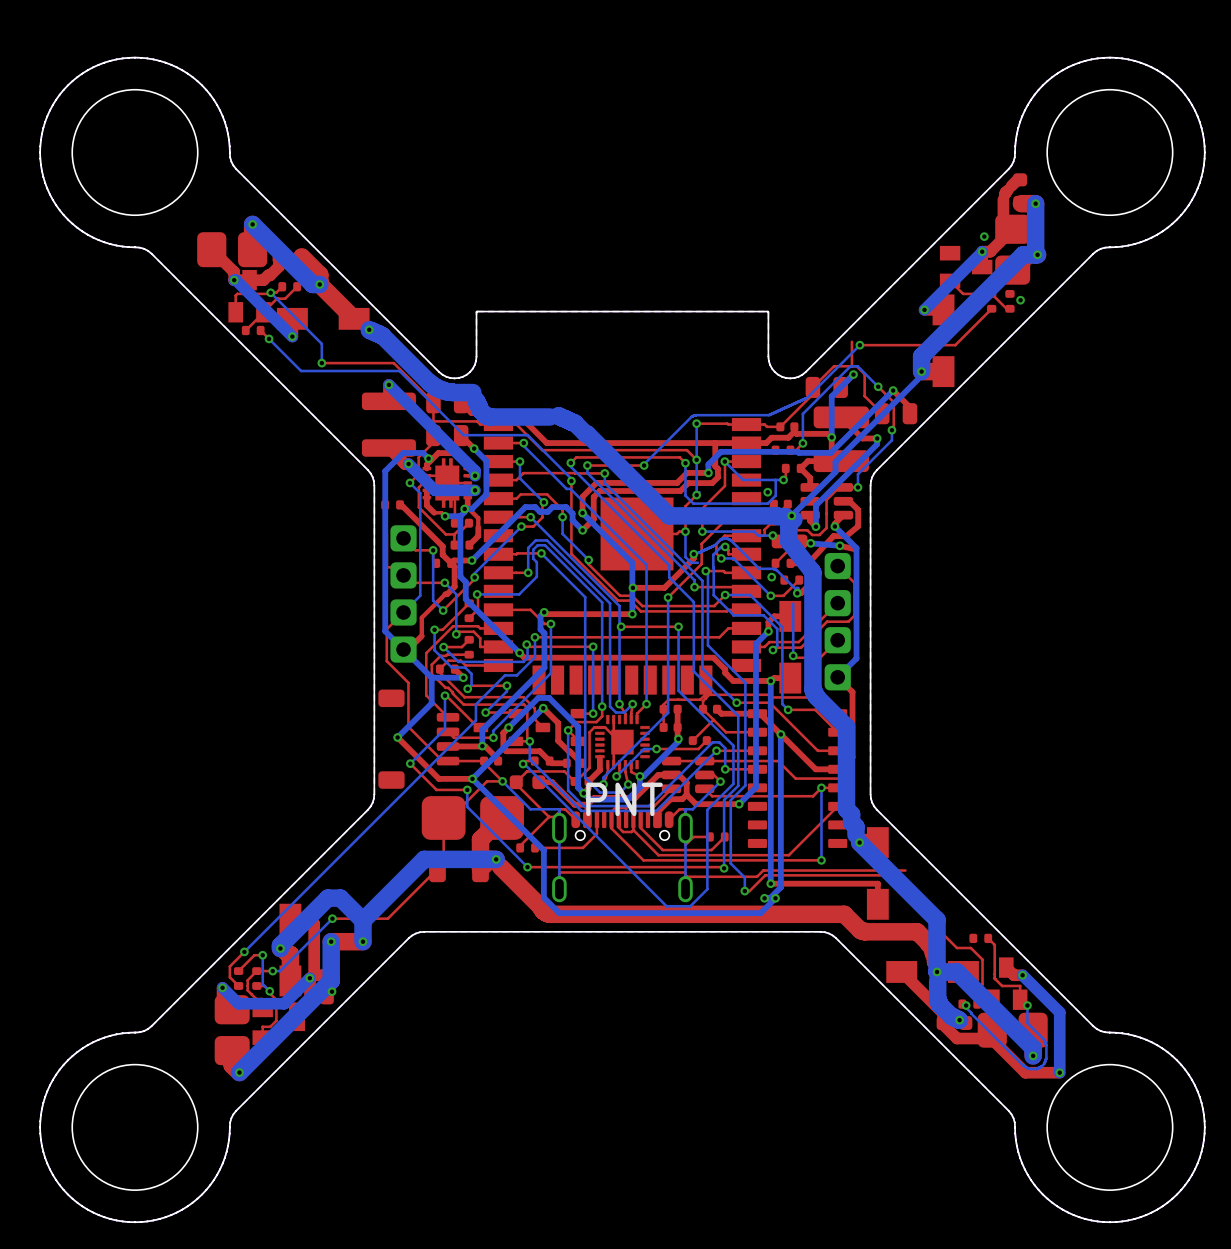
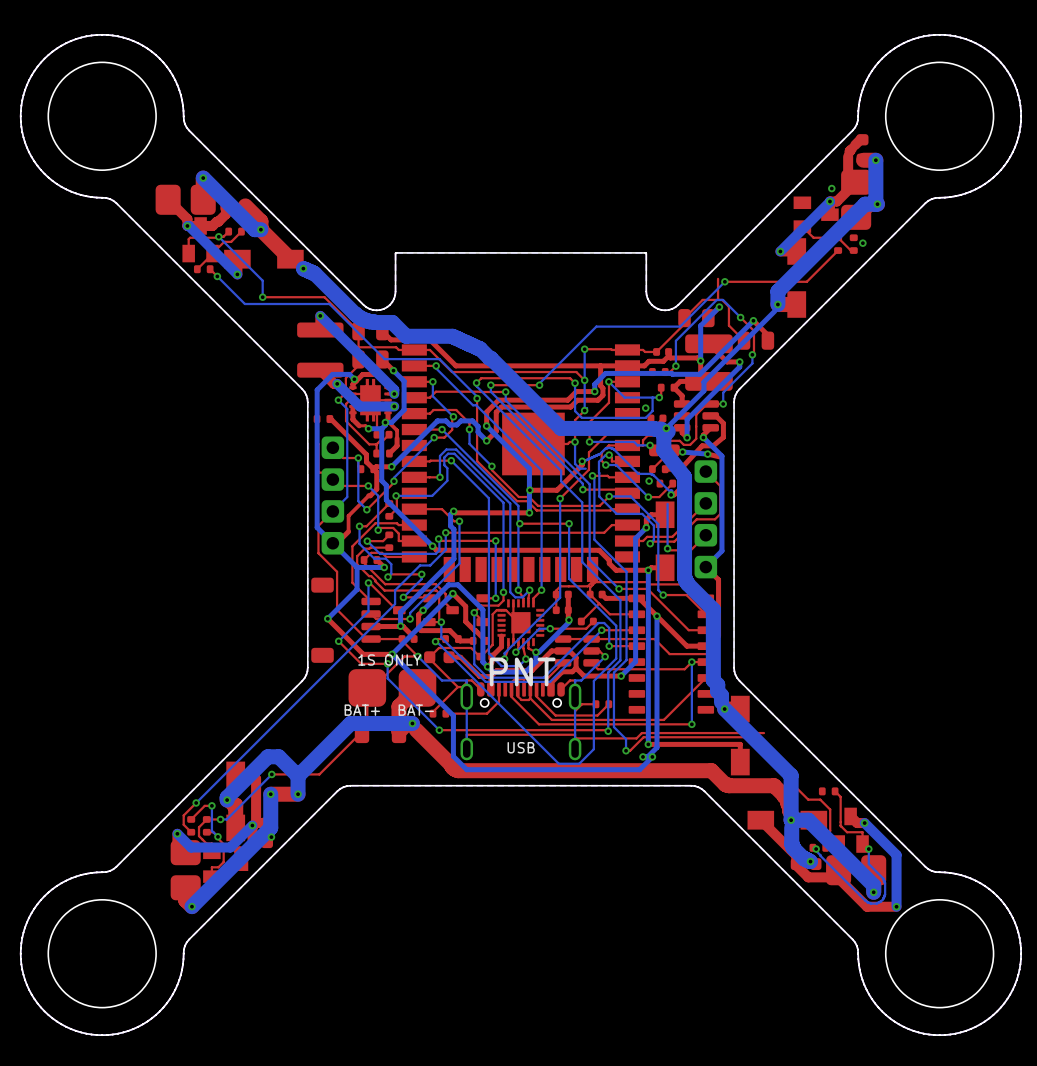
bottom track: none -> (392, 322) (406, 336) (452, 336) (465, 342)
bottom track: none -> (680, 326) (596, 326) (539, 383)
bottom track: (806, 398) (769, 415) (693, 415) (646, 461) -> none
bottom track: (476, 400) (480, 410) (488, 416) (549, 417) -> none
text: none -> 1S ONLY (389, 659)
text: none -> BAT+ BAT- (389, 710)
text: none -> USB (521, 747)

